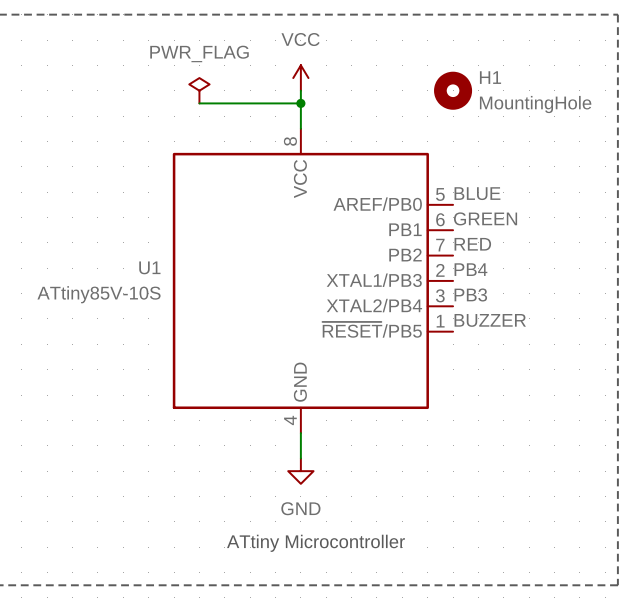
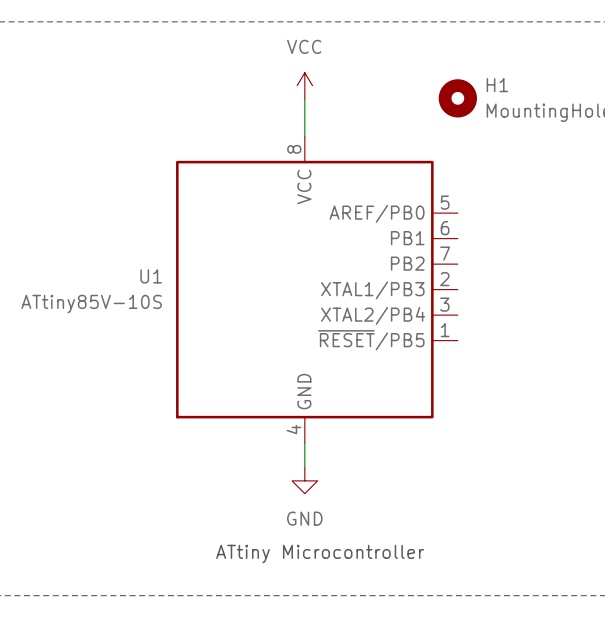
power symbol: PWR_FLAG (199, 90) -> none
wire: (199, 103) (300, 103) -> none
junction: (300, 103) -> none
label: BLUE (477, 193) -> none
label: GREEN (485, 218) -> none
label: RED (472, 244) -> none
label: PB4 (470, 269) -> none
label: PB3 (470, 294) -> none
label: BUZZER (490, 320) -> none

